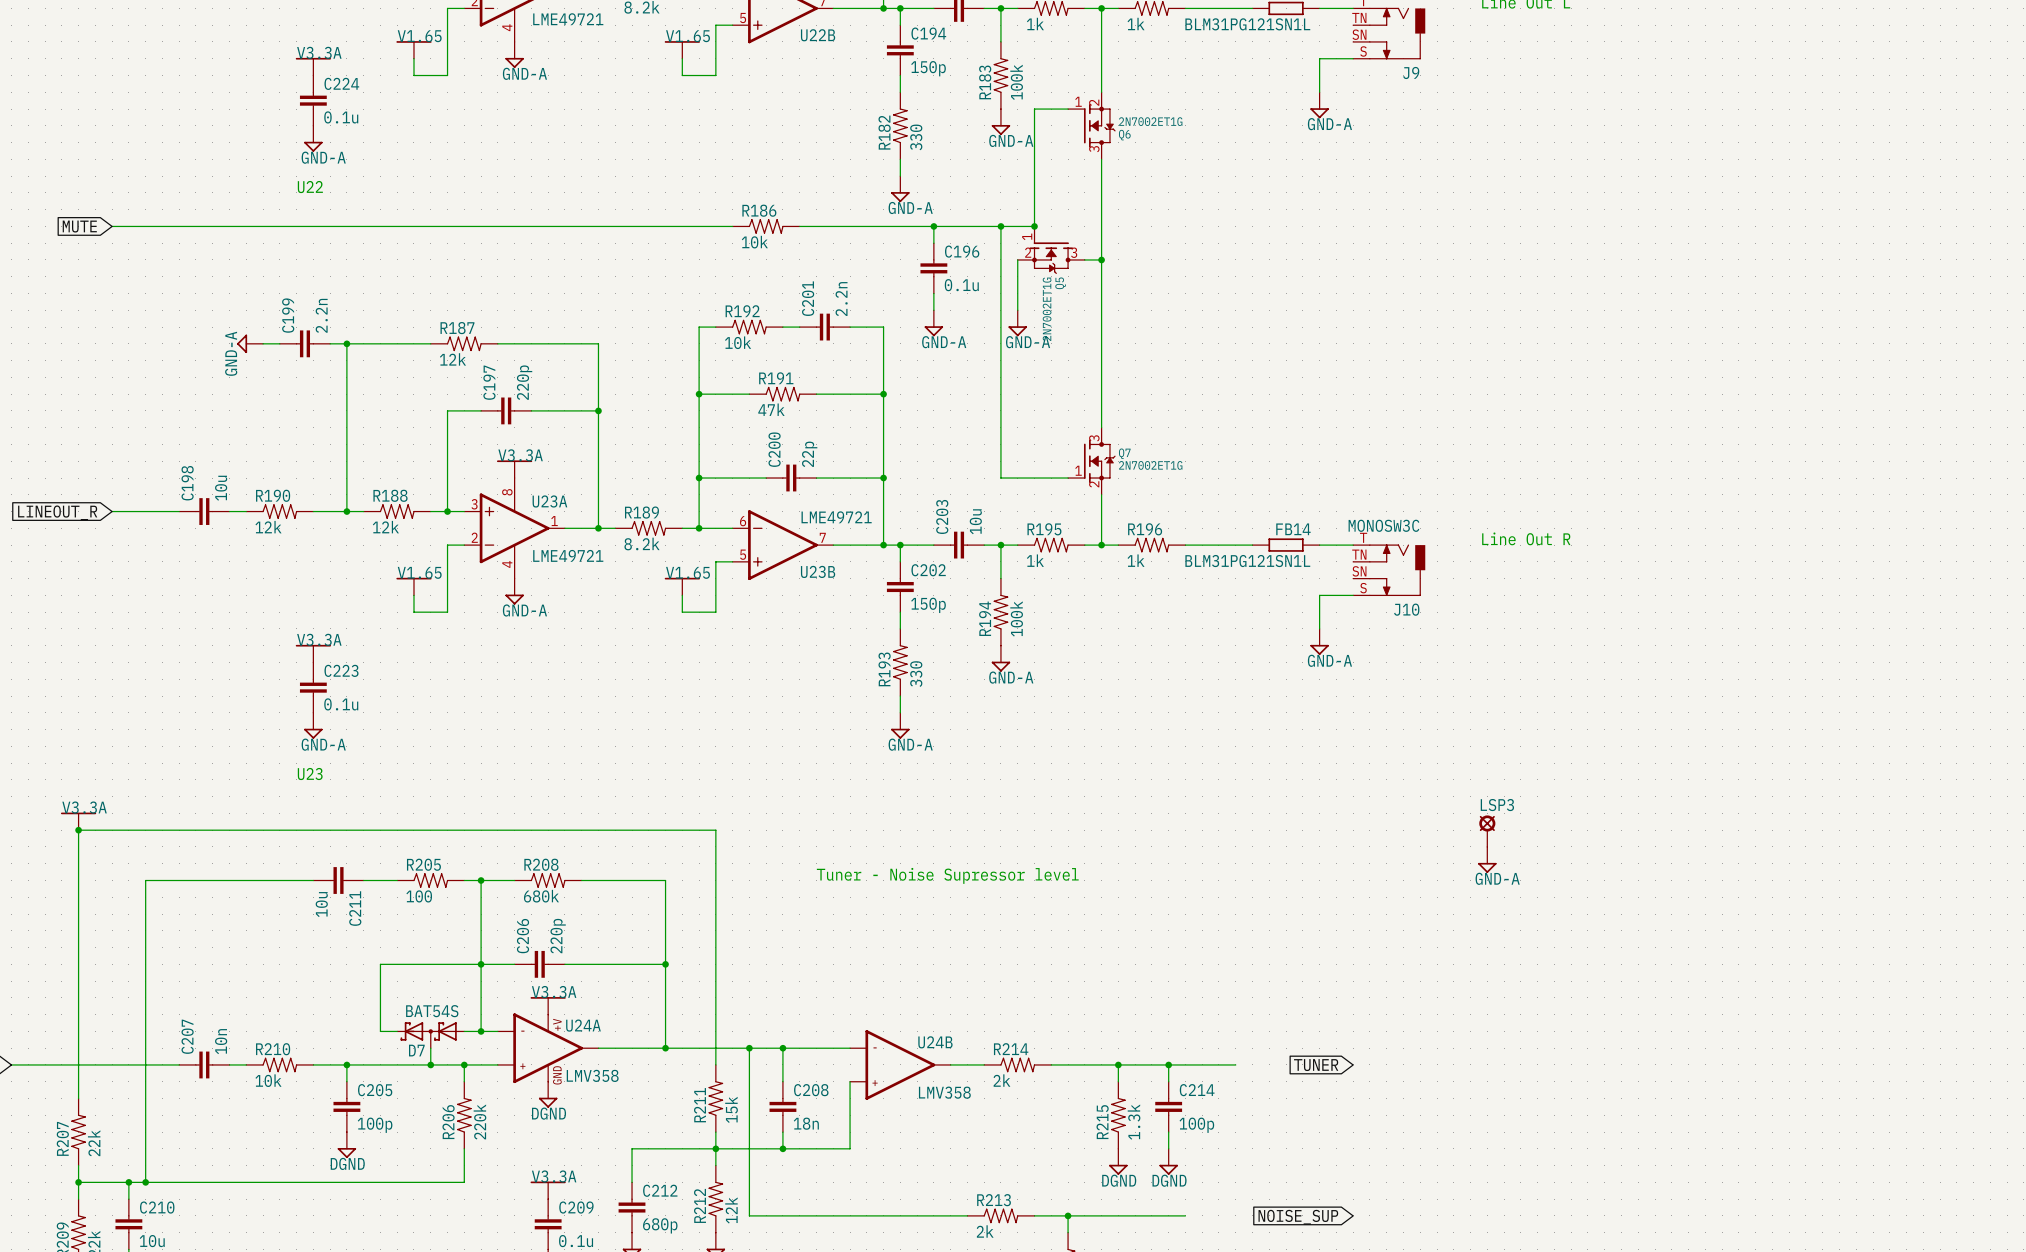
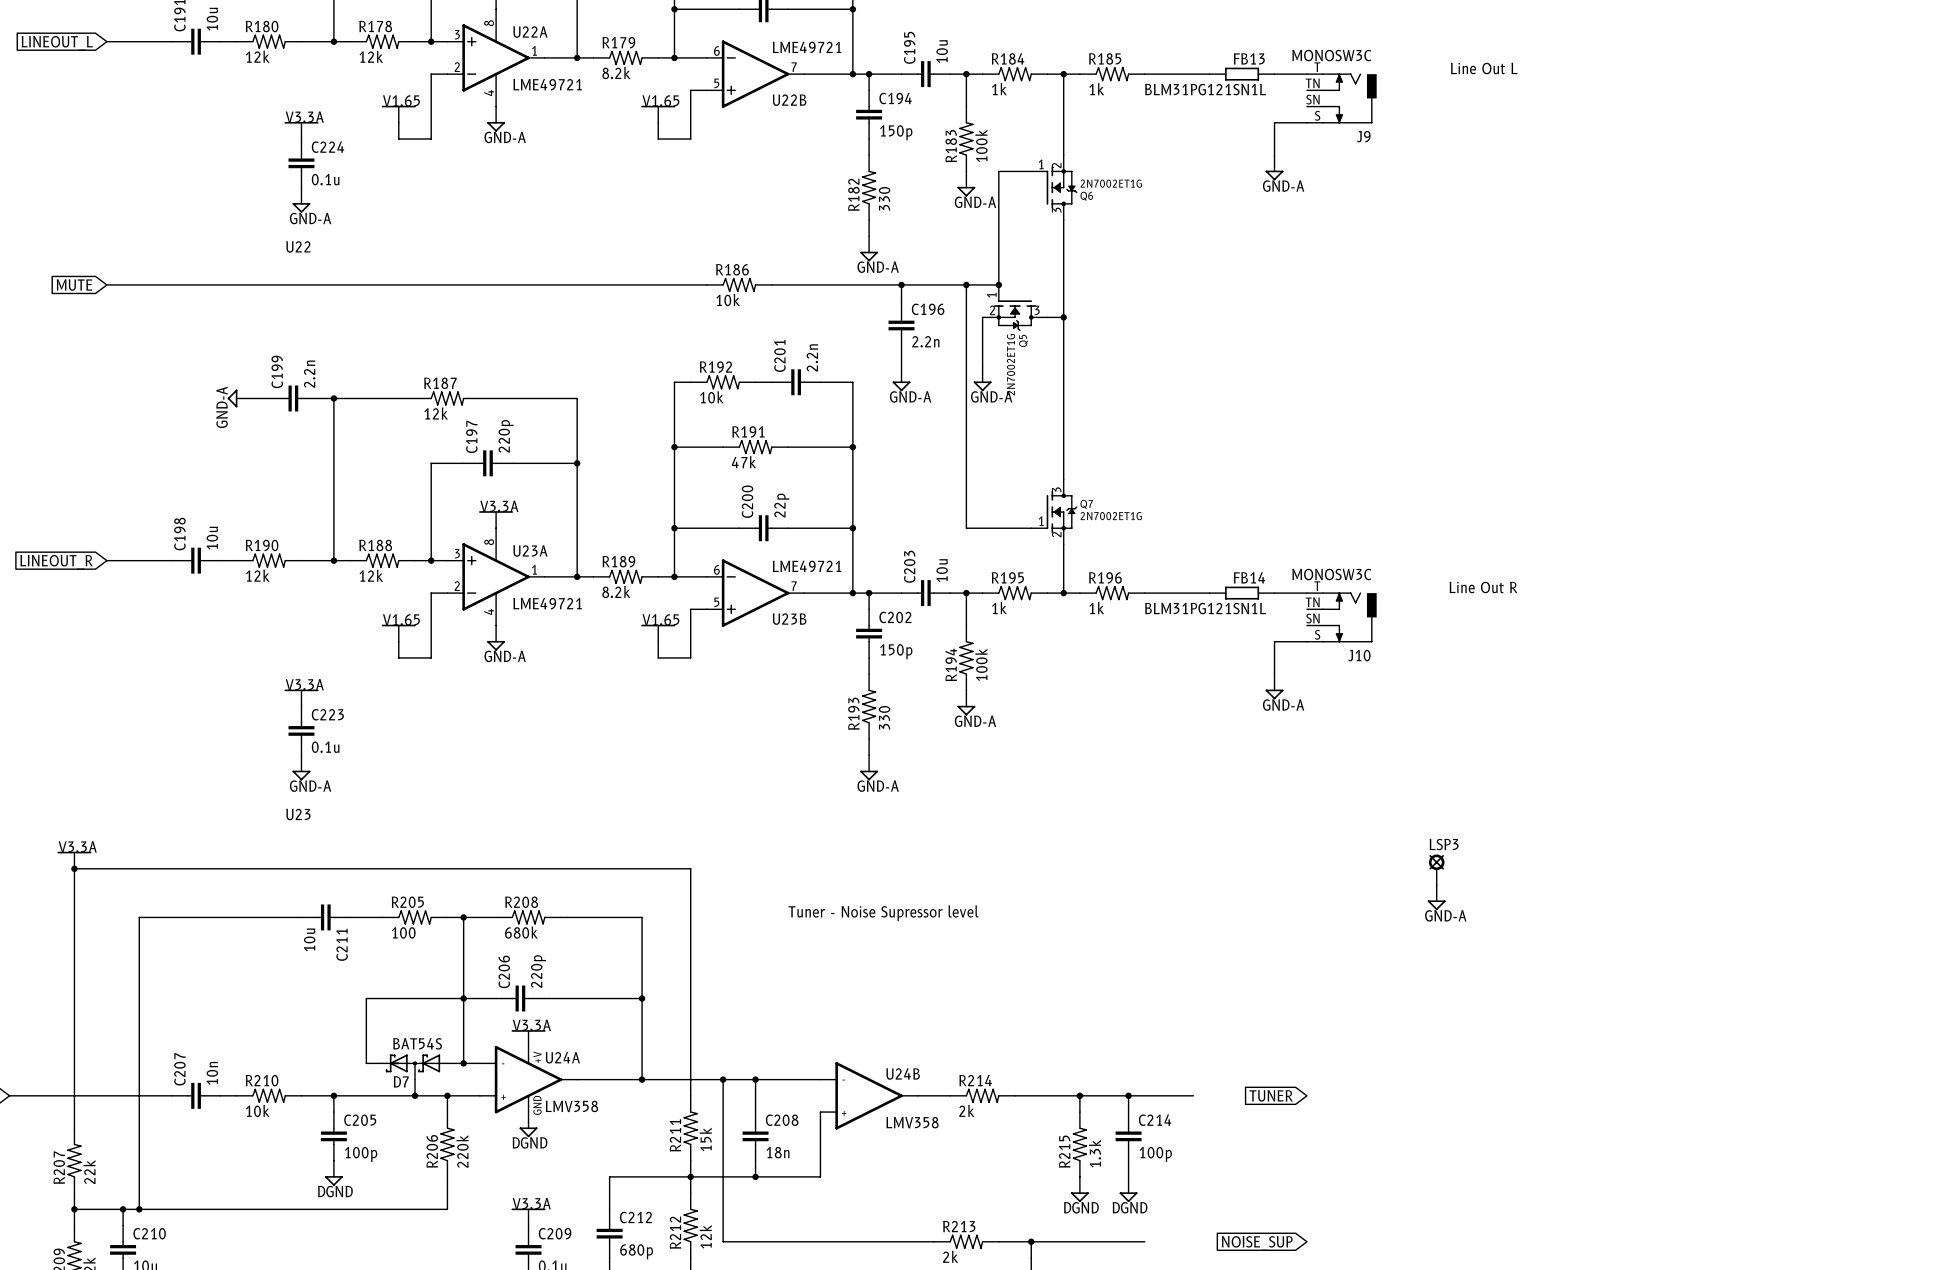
C196 value: 0.1u (961, 285) -> 2.2n (925, 341)

